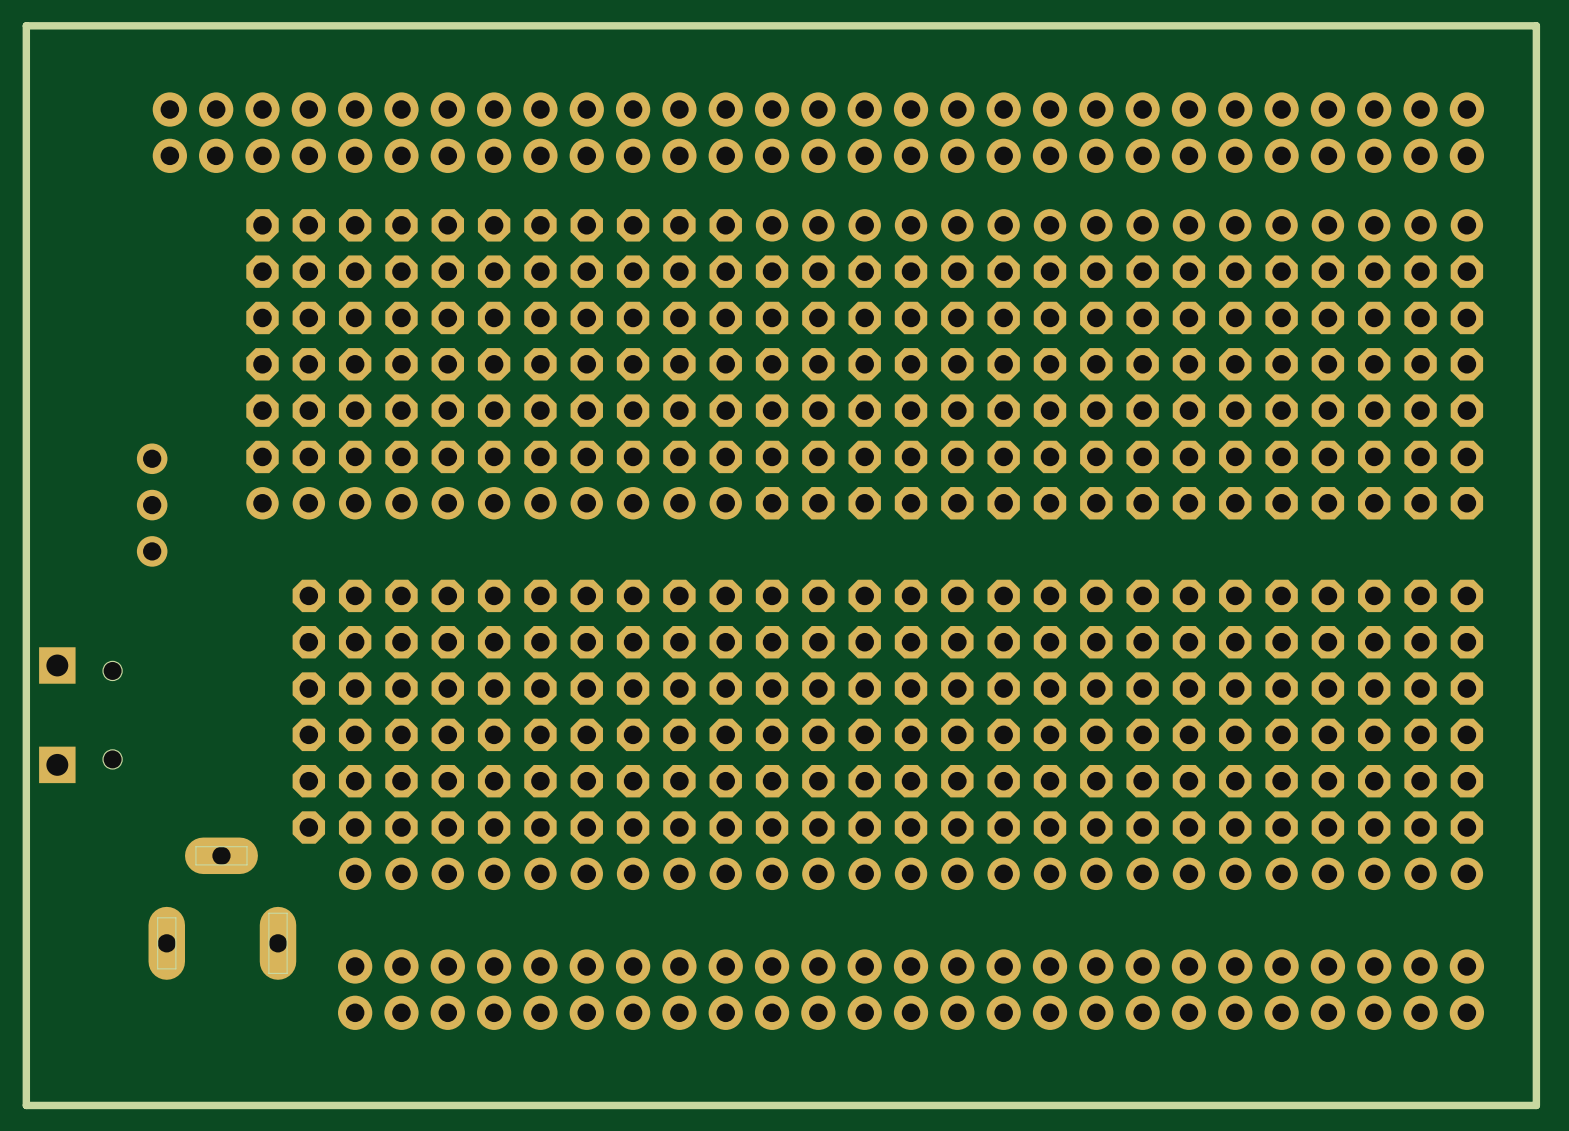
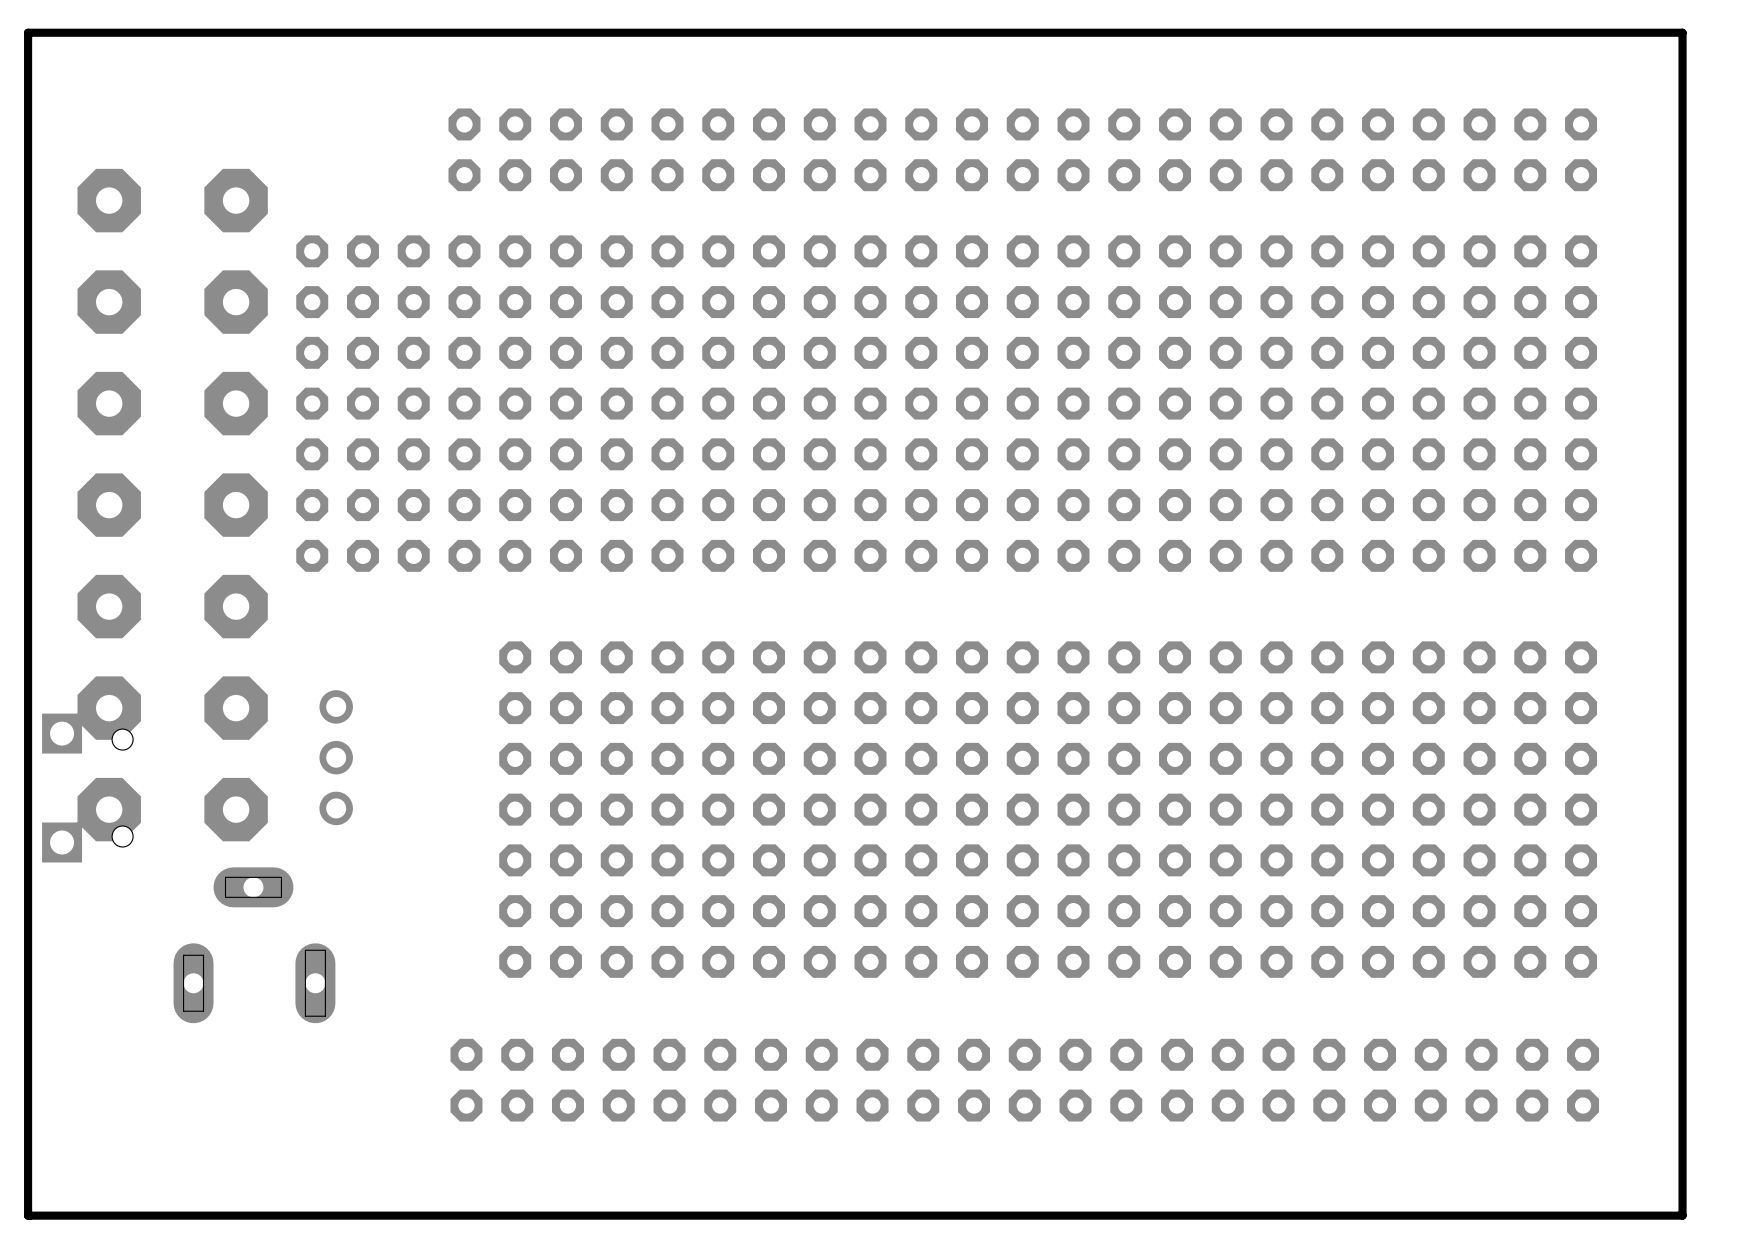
part: none -> (464, 124)
part: none -> (515, 124)
part: none -> (565, 124)
part: none -> (616, 124)
part: none -> (667, 124)
part: none -> (718, 124)
part: none -> (769, 124)
part: none -> (819, 124)
part: none -> (870, 124)
part: (818, 109) -> none
part: none -> (921, 124)
part: none -> (972, 124)
part: none -> (1022, 124)
part: none -> (1073, 124)
part: none -> (1124, 124)
part: none -> (1175, 124)
part: none -> (1225, 124)
part: none -> (1276, 124)
part: none -> (1327, 124)
part: none -> (1378, 124)
part: none -> (1428, 124)
part: none -> (1479, 124)
part: none -> (1530, 124)
part: none -> (1581, 124)
part: none -> (464, 175)
part: none -> (515, 175)
part: none -> (565, 175)
part: none -> (616, 175)
part: none -> (667, 175)
part: none -> (718, 175)
part: none -> (769, 175)
part: none -> (819, 175)
part: none -> (870, 175)
part: (818, 155) -> none
part: none -> (921, 175)
part: none -> (972, 175)
part: none -> (1022, 175)
part: none -> (1073, 175)
part: none -> (1124, 175)
part: none -> (1175, 175)
part: none -> (1225, 175)
part: none -> (1276, 175)
part: none -> (1327, 175)
part: none -> (1378, 175)
part: none -> (1428, 175)
part: none -> (1479, 175)
part: none -> (1530, 175)
part: none -> (1581, 175)
part: none -> (109, 200)
part: none -> (236, 200)
part: none -> (312, 251)
part: none -> (362, 251)
part: none -> (413, 251)
part: none -> (464, 251)
part: none -> (515, 251)
part: none -> (565, 251)
part: none -> (616, 251)
part: none -> (667, 251)
part: none -> (718, 251)
part: none -> (769, 251)
part: none -> (819, 251)
part: (772, 225) -> none
part: none -> (870, 251)
part: (818, 225) -> none
part: none -> (921, 251)
part: (864, 225) -> none
part: none -> (972, 251)
part: (911, 225) -> none
part: none -> (1022, 251)
part: (957, 225) -> none
part: none -> (1073, 251)
part: (1003, 225) -> none
part: none -> (1124, 251)
part: (1049, 225) -> none
part: none -> (1175, 251)
part: (1096, 225) -> none
part: none -> (1225, 251)
part: (1142, 225) -> none
part: none -> (1276, 251)
part: (1188, 225) -> none
part: none -> (1327, 251)
part: (1235, 225) -> none
part: none -> (1378, 251)
part: (1281, 225) -> none
part: none -> (1428, 251)
part: (1327, 225) -> none
part: none -> (1479, 251)
part: (1374, 225) -> none
part: none -> (1530, 251)
part: (1420, 225) -> none
part: none -> (1581, 251)
part: (1466, 225) -> none
part: none -> (109, 302)
part: none -> (236, 302)
part: none -> (312, 302)
part: none -> (362, 302)
part: none -> (413, 302)
part: none -> (464, 302)
part: none -> (515, 302)
part: none -> (565, 302)
part: none -> (616, 302)
part: none -> (667, 302)
part: none -> (718, 302)
part: none -> (769, 302)
part: none -> (819, 302)
part: none -> (870, 302)
part: none -> (921, 302)
part: none -> (972, 302)
part: none -> (1022, 302)
part: none -> (1073, 302)
part: none -> (1124, 302)
part: none -> (1175, 302)
part: none -> (1225, 302)
part: none -> (1276, 302)
part: none -> (1327, 302)
part: none -> (1378, 302)
part: none -> (1428, 302)
part: none -> (1479, 302)
part: none -> (1530, 302)
part: none -> (1581, 302)
part: none -> (312, 352)
part: none -> (362, 352)
part: none -> (413, 352)
part: none -> (464, 352)
part: none -> (515, 352)
part: none -> (565, 352)
part: none -> (616, 352)
part: none -> (667, 352)
part: none -> (718, 352)
part: none -> (769, 352)
part: none -> (819, 352)
part: none -> (870, 352)
part: none -> (921, 352)
part: none -> (972, 352)
part: none -> (1022, 352)
part: none -> (1073, 352)
part: none -> (1124, 352)
part: none -> (1175, 352)
part: none -> (1225, 352)
part: none -> (1276, 352)
part: none -> (1327, 352)
part: none -> (1378, 352)
part: none -> (1428, 352)
part: none -> (1479, 352)
part: none -> (1530, 352)
part: none -> (1581, 352)
part: (262, 341) -> none
part: (308, 341) -> none
part: (355, 341) -> none
part: (401, 341) -> none
part: (447, 341) -> none
part: (494, 341) -> none
part: (540, 341) -> none
part: (586, 341) -> none
part: (633, 341) -> none
part: (679, 341) -> none
part: (725, 341) -> none
part: none -> (109, 403)
part: none -> (236, 403)
part: none -> (312, 403)
part: none -> (362, 403)
part: none -> (413, 403)
part: none -> (464, 403)
part: none -> (515, 403)
part: none -> (565, 403)
part: none -> (616, 403)
part: none -> (667, 403)
part: none -> (718, 403)
part: none -> (769, 403)
part: none -> (819, 403)
part: none -> (870, 403)
part: none -> (921, 403)
part: none -> (972, 403)
part: none -> (1022, 403)
part: none -> (1073, 403)
part: none -> (1124, 403)
part: none -> (1175, 403)
part: none -> (1225, 403)
part: none -> (1276, 403)
part: none -> (1327, 403)
part: none -> (1378, 403)
part: none -> (1428, 403)
part: none -> (1479, 403)
part: none -> (1530, 403)
part: none -> (1581, 403)
part: (772, 387) -> none
part: (818, 387) -> none
part: (864, 387) -> none
part: (911, 387) -> none
part: (957, 387) -> none
part: (1003, 387) -> none
part: (1049, 387) -> none
part: (1096, 387) -> none
part: (1142, 387) -> none
part: (1188, 387) -> none
part: (1235, 387) -> none
part: (1281, 387) -> none
part: (1327, 387) -> none
part: (1374, 387) -> none
part: (1420, 387) -> none
part: (1466, 387) -> none
part: none -> (312, 454)
part: none -> (362, 454)
part: none -> (413, 454)
part: none -> (464, 454)
part: none -> (515, 454)
part: none -> (565, 454)
part: none -> (616, 454)
part: none -> (667, 454)
part: none -> (718, 454)
part: none -> (769, 454)
part: none -> (819, 454)
part: none -> (870, 454)
part: none -> (921, 454)
part: none -> (972, 454)
part: none -> (1022, 454)
part: none -> (1073, 454)
part: none -> (1124, 454)
part: none -> (1175, 454)
part: none -> (1225, 454)
part: none -> (1276, 454)
part: none -> (1327, 454)
part: none -> (1378, 454)
part: none -> (1428, 454)
part: none -> (1479, 454)
part: none -> (1530, 454)
part: none -> (1581, 454)
part: none -> (109, 505)
part: none -> (236, 505)
part: none -> (312, 505)
part: none -> (362, 505)
part: none -> (413, 505)
part: none -> (464, 505)
part: none -> (515, 505)
part: none -> (565, 505)
part: none -> (616, 505)
part: none -> (667, 505)
part: none -> (718, 505)
part: none -> (769, 505)
part: none -> (819, 505)
part: none -> (870, 505)
part: none -> (921, 505)
part: none -> (972, 505)
part: none -> (1022, 505)
part: none -> (1073, 505)
part: none -> (1124, 505)
part: none -> (1175, 505)
part: none -> (1225, 505)
part: none -> (1276, 505)
part: none -> (1327, 505)
part: none -> (1378, 505)
part: none -> (1428, 505)
part: none -> (1479, 505)
part: none -> (1530, 505)
part: none -> (1581, 505)
part: (262, 503) -> none
part: none -> (312, 555)
part: (308, 503) -> none
part: none -> (362, 555)
part: (355, 503) -> none
part: none -> (413, 555)
part: (401, 503) -> none
part: none -> (464, 555)
part: (447, 503) -> none
part: none -> (515, 555)
part: (494, 503) -> none
part: none -> (565, 555)
part: (540, 503) -> none
part: none -> (616, 555)
part: (586, 503) -> none
part: none -> (667, 555)
part: (633, 503) -> none
part: none -> (718, 555)
part: (679, 503) -> none
part: none -> (769, 555)
part: (725, 503) -> none
part: none -> (819, 555)
part: none -> (870, 555)
part: none -> (921, 555)
part: none -> (972, 555)
part: none -> (1022, 555)
part: none -> (1073, 555)
part: none -> (1124, 555)
part: none -> (1175, 555)
part: none -> (1225, 555)
part: none -> (1276, 555)
part: none -> (1327, 555)
part: none -> (1378, 555)
part: none -> (1428, 555)
part: none -> (1479, 555)
part: none -> (1530, 555)
part: none -> (1581, 555)
part position: (152, 505) -> (336, 757)
part: none -> (109, 606)
part: none -> (236, 606)
part: none -> (515, 657)
part: none -> (565, 657)
part: none -> (616, 657)
part: none -> (667, 657)
part: none -> (718, 657)
part: none -> (769, 657)
part: none -> (819, 657)
part: none -> (870, 657)
part: none -> (921, 657)
part: none -> (972, 657)
part: none -> (1022, 657)
part: none -> (1073, 657)
part: none -> (1124, 657)
part: none -> (1175, 657)
part: none -> (1225, 657)
part: none -> (1276, 657)
part: none -> (1327, 657)
part: none -> (1378, 657)
part: none -> (1428, 657)
part: none -> (1479, 657)
part: none -> (1530, 657)
part: none -> (1581, 657)
part: none -> (109, 708)
part: none -> (236, 708)
part: none -> (515, 708)
part: none -> (565, 708)
part: none -> (616, 708)
part: none -> (667, 708)
part: none -> (718, 708)
part: none -> (769, 708)
part: none -> (819, 708)
part: none -> (870, 708)
part: none -> (921, 708)
part: none -> (972, 708)
part: none -> (1022, 708)
part: none -> (1073, 708)
part: none -> (1124, 708)
part: none -> (1175, 708)
part: none -> (1225, 708)
part: none -> (1276, 708)
part: none -> (1327, 708)
part: none -> (1378, 708)
part: none -> (1428, 708)
part: none -> (1479, 708)
part: none -> (1530, 708)
part: none -> (1581, 708)
part: none -> (515, 758)
part: none -> (565, 758)
part: none -> (616, 758)
part: none -> (667, 758)
part: none -> (718, 758)
part: none -> (769, 758)
part: none -> (819, 758)
part: none -> (870, 758)
part: none -> (921, 758)
part: none -> (972, 758)
part: none -> (1022, 758)
part: none -> (1073, 758)
part: none -> (1124, 758)
part: none -> (1175, 758)
part: none -> (1225, 758)
part: none -> (1276, 758)
part: none -> (1327, 758)
part: none -> (1378, 758)
part: none -> (1428, 758)
part: none -> (1479, 758)
part: none -> (1530, 758)
part: none -> (1581, 758)
part: (308, 711) -> none
part: (355, 711) -> none
part: (401, 711) -> none
part: (447, 711) -> none
part: (494, 711) -> none
part: (540, 711) -> none
part: (586, 711) -> none
part: (633, 711) -> none
part: (679, 711) -> none
part: (725, 711) -> none
part: (772, 711) -> none
part: (818, 711) -> none
part: (864, 711) -> none
part: (911, 711) -> none
part: (957, 711) -> none
part: (1003, 711) -> none
part: (1049, 711) -> none
part: (1096, 711) -> none
part: (1142, 711) -> none
part: (1188, 711) -> none
part: (1235, 711) -> none
part: (1281, 711) -> none
part: (1327, 711) -> none
part: (1374, 711) -> none
part: (1420, 711) -> none
part: (1466, 711) -> none
part: none -> (109, 809)
part: none -> (236, 809)
part: none -> (515, 809)
part: none -> (565, 809)
part: none -> (616, 809)
part: none -> (667, 809)
part: none -> (718, 809)
part: none -> (769, 809)
part: none -> (819, 809)
part: none -> (870, 809)
part: none -> (921, 809)
part: none -> (972, 809)
part: none -> (1022, 809)
part: none -> (1073, 809)
part: none -> (1124, 809)
part: none -> (1175, 809)
part: none -> (1225, 809)
part: none -> (1276, 809)
part: none -> (1327, 809)
part: none -> (1378, 809)
part: none -> (1428, 809)
part: none -> (1479, 809)
part: none -> (1530, 809)
part: none -> (1581, 809)
part: none -> (515, 860)
part: none -> (565, 860)
part: none -> (616, 860)
part: none -> (667, 860)
part: none -> (718, 860)
part: none -> (769, 860)
part: none -> (819, 860)
part: none -> (870, 860)
part: none -> (921, 860)
part: none -> (972, 860)
part: none -> (1022, 860)
part: none -> (1073, 860)
part: none -> (1124, 860)
part: none -> (1175, 860)
part: none -> (1225, 860)
part: none -> (1276, 860)
part: none -> (1327, 860)
part: none -> (1378, 860)
part: none -> (1428, 860)
part: none -> (1479, 860)
part: none -> (1530, 860)
part: none -> (1581, 860)
part: none -> (515, 911)
part: none -> (565, 911)
part: none -> (616, 911)
part: none -> (667, 911)
part: none -> (718, 911)
part: none -> (769, 911)
part: none -> (819, 911)
part: none -> (870, 911)
part: none -> (921, 911)
part: none -> (972, 911)
part: none -> (1022, 911)
part: none -> (1073, 911)
part: none -> (1124, 911)
part: none -> (1175, 911)
part: none -> (1225, 911)
part: none -> (1276, 911)
part: none -> (1327, 911)
part: none -> (1378, 911)
part: none -> (1428, 911)
part: none -> (1479, 911)
part: none -> (1530, 911)
part: none -> (1581, 911)
part: (355, 873) -> none
part: (401, 873) -> none
part: (447, 873) -> none
part: none -> (515, 961)
part: (494, 873) -> none
part: none -> (565, 961)
part: (540, 873) -> none
part: none -> (616, 961)
part: (586, 873) -> none
part: none -> (667, 961)
part: (633, 873) -> none
part: none -> (718, 961)
part: (679, 873) -> none
part: none -> (769, 961)
part: (725, 873) -> none
part: none -> (819, 961)
part: (772, 873) -> none
part: none -> (870, 961)
part: (818, 873) -> none
part: none -> (921, 961)
part: (864, 873) -> none
part: none -> (972, 961)
part: (911, 873) -> none
part: none -> (1022, 961)
part: (957, 873) -> none
part: none -> (1073, 961)
part: (1003, 873) -> none
part: none -> (1124, 961)
part: (1049, 873) -> none
part: none -> (1175, 961)
part: (1096, 873) -> none
part: none -> (1225, 961)
part: (1142, 873) -> none
part: none -> (1276, 961)
part: (1188, 873) -> none
part: none -> (1327, 961)
part: (1235, 873) -> none
part: none -> (1378, 961)
part: (1281, 873) -> none
part: none -> (1428, 961)
part: (1327, 873) -> none
part: none -> (1479, 961)
part: (1374, 873) -> none
part: none -> (1530, 961)
part: (1420, 873) -> none
part: none -> (1581, 961)
part: (1466, 873) -> none
part position: (222, 908) -> (254, 945)
part footprint: [569, 949, 1485, 984] -> [1110, 1038, 1143, 1071]
part: none -> (466, 1054)
part: none -> (517, 1054)
part: none -> (567, 1054)
part: none -> (618, 1054)
part: none -> (669, 1054)
part: none -> (720, 1054)
part: none -> (770, 1054)
part: none -> (821, 1054)
part: none -> (872, 1054)
part: none -> (923, 1054)
part: none -> (974, 1054)
part: none -> (1024, 1054)
part: none -> (1075, 1054)
part: none -> (1177, 1054)
part: none -> (1227, 1054)
part: none -> (1278, 1054)
part: none -> (1329, 1054)
part: none -> (1380, 1054)
part: none -> (1430, 1054)
part: none -> (1481, 1054)
part: none -> (1532, 1054)
part: none -> (1583, 1054)
part: (447, 966) -> none
part footprint: [569, 995, 1485, 1030] -> [1110, 1089, 1143, 1122]
part: none -> (466, 1105)
part: none -> (517, 1105)
part: none -> (567, 1105)
part: none -> (618, 1105)
part: none -> (669, 1105)
part: none -> (720, 1105)
part: none -> (770, 1105)
part: none -> (821, 1105)
part: none -> (872, 1105)
part: none -> (923, 1105)
part: none -> (974, 1105)
part: none -> (1024, 1105)
part: none -> (1075, 1105)
part: none -> (1177, 1105)
part: none -> (1227, 1105)
part: none -> (1278, 1105)
part: none -> (1329, 1105)
part: none -> (1380, 1105)
part: none -> (1430, 1105)
part: none -> (1481, 1105)
part: none -> (1532, 1105)
part: none -> (1583, 1105)
part: (447, 1012) -> none

